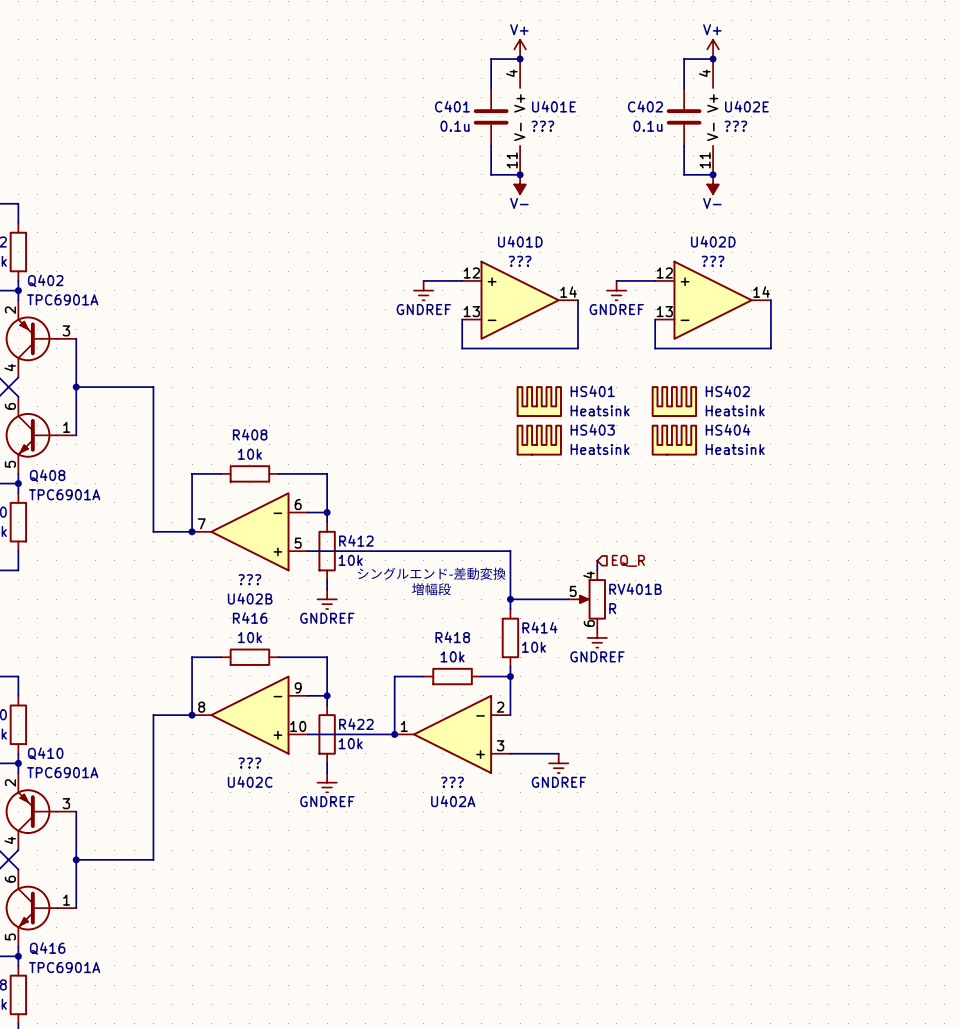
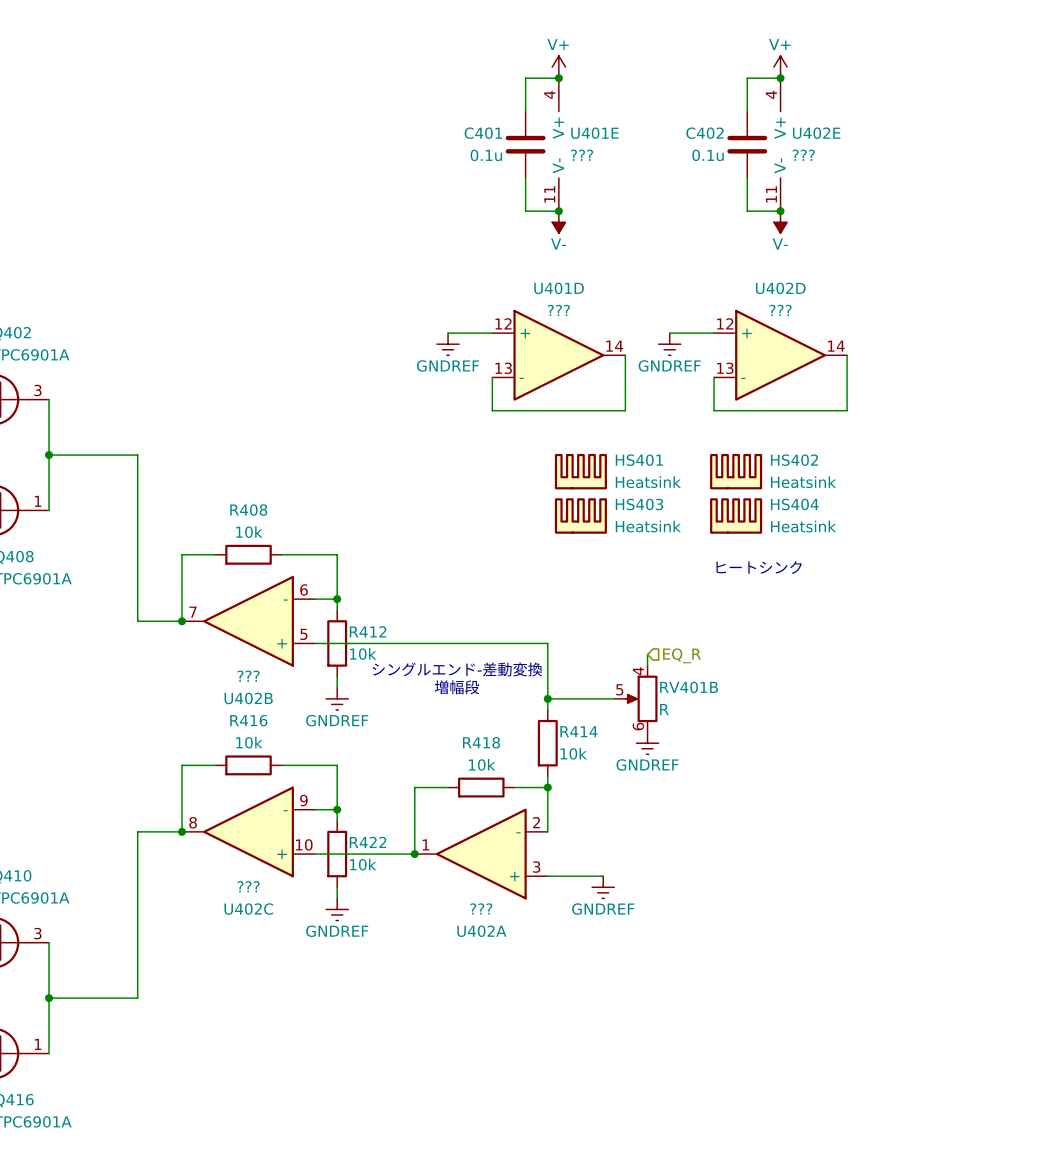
text: none -> ヒートシンク (759, 567)

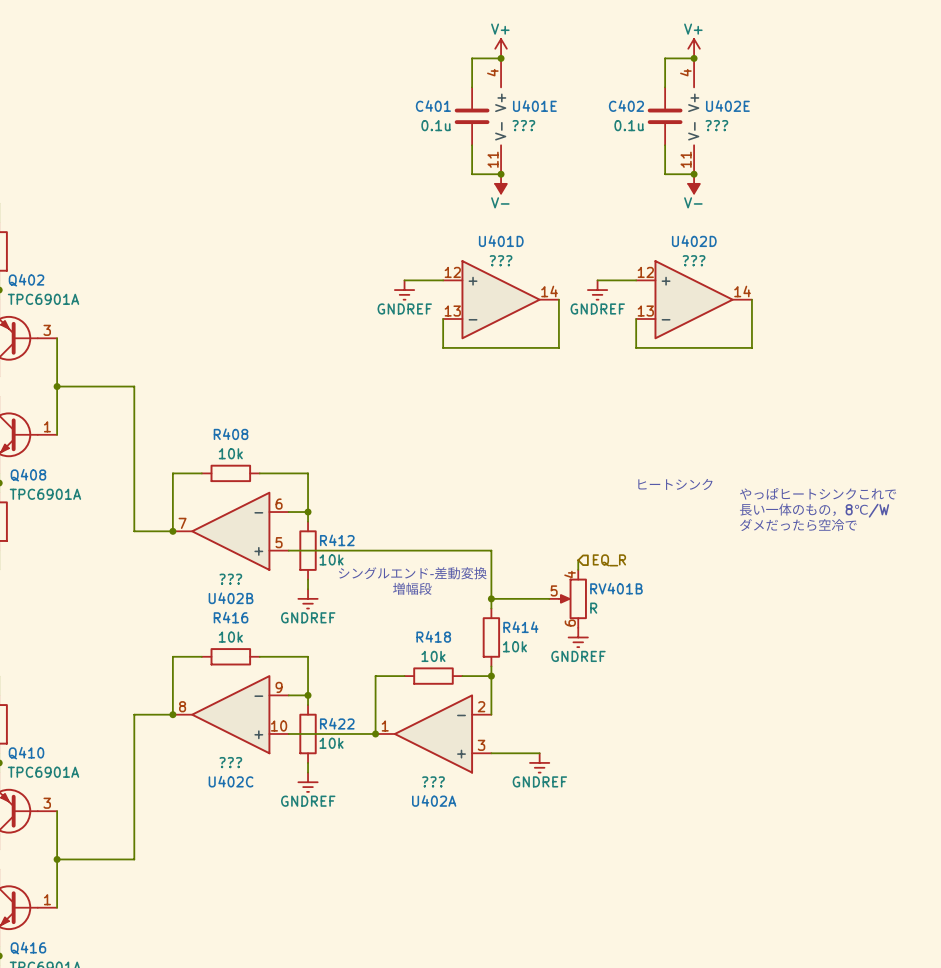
HS401: Heatsink (580, 471) -> none
HS402: Heatsink (736, 471) -> none
HS403: Heatsink (580, 515) -> none
HS404: Heatsink (736, 515) -> none
text: none -> やっぱヒートシンクこれで (818, 493)
text: none -> 長い一体のもの，8℃/W (814, 510)
text: none -> ダメだったら空冷で (798, 525)

